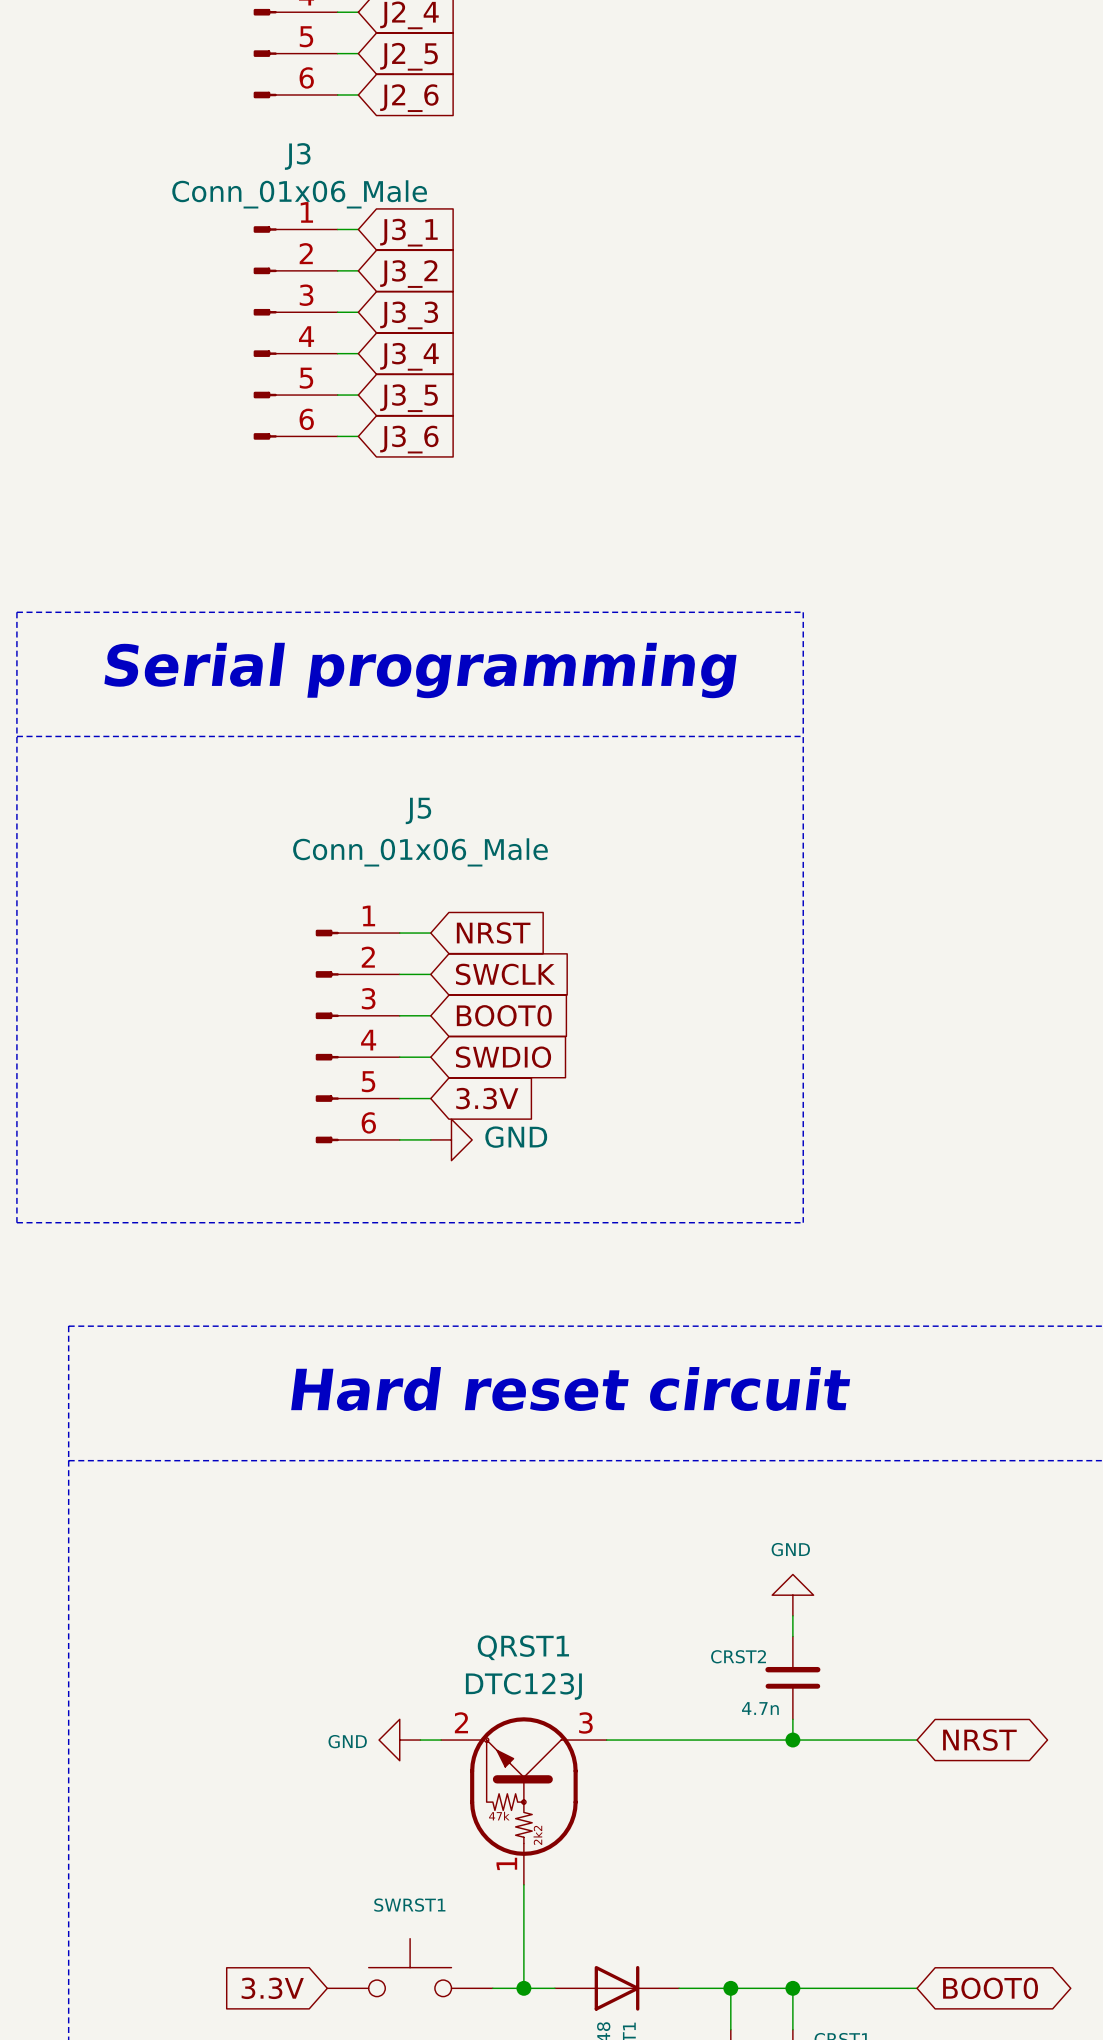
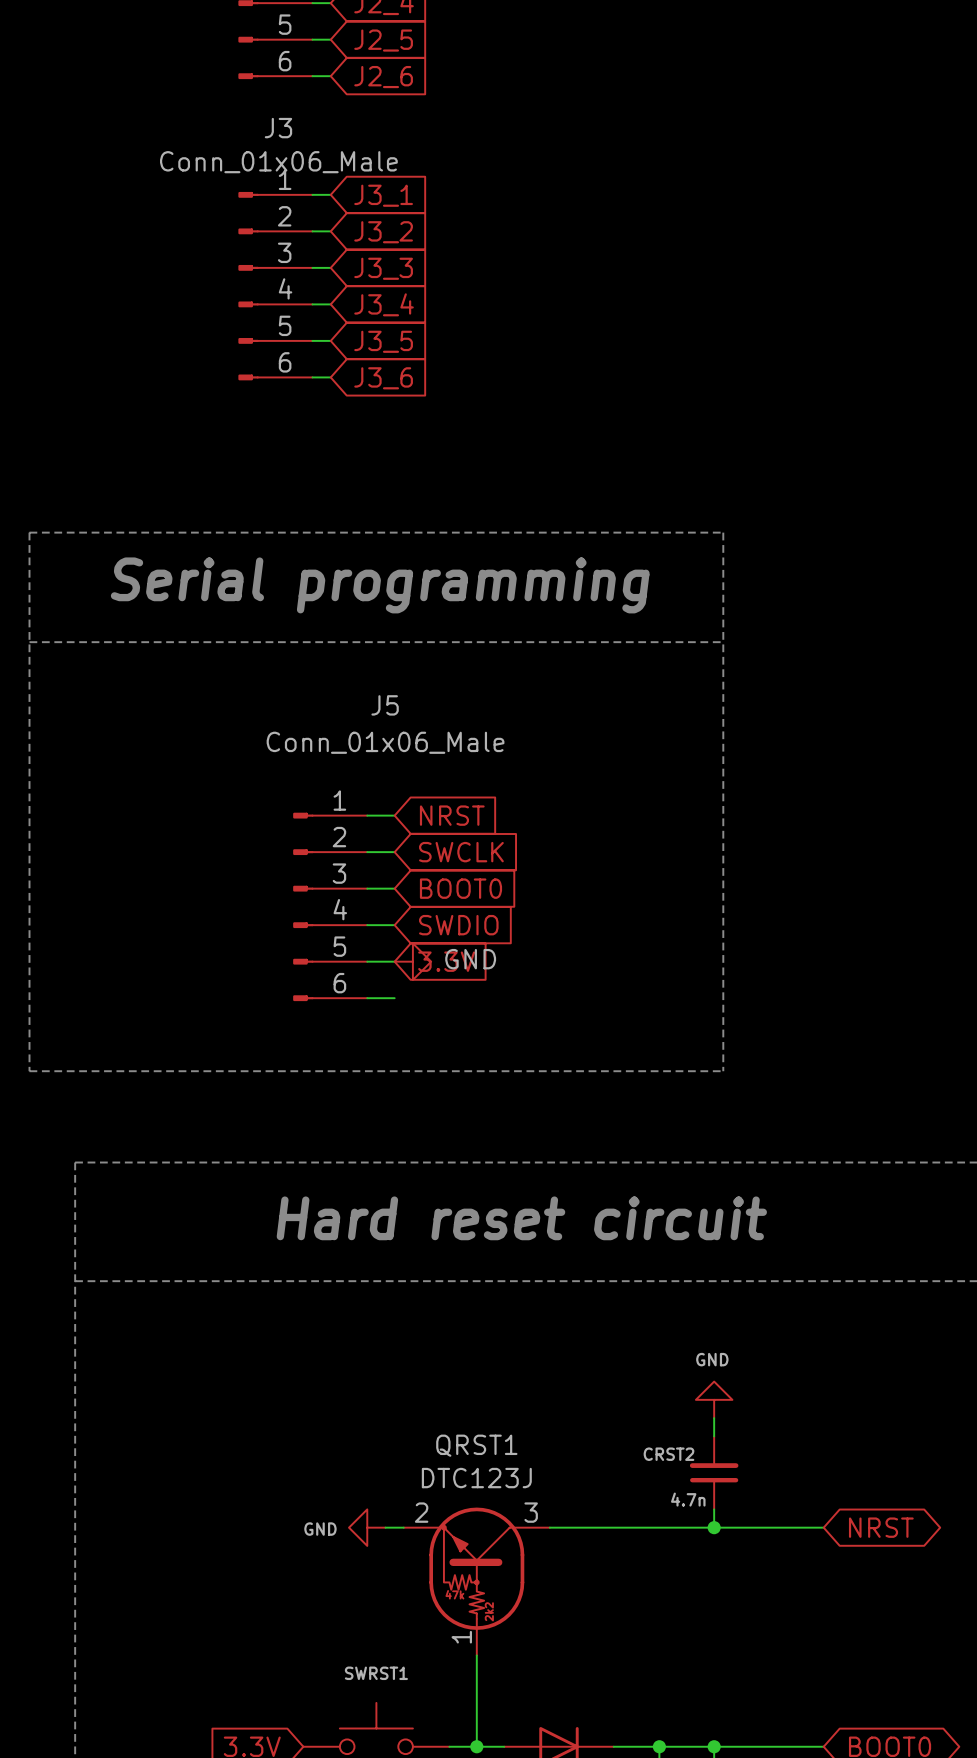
power symbol position: GND (451, 1139) -> GND (412, 961)

